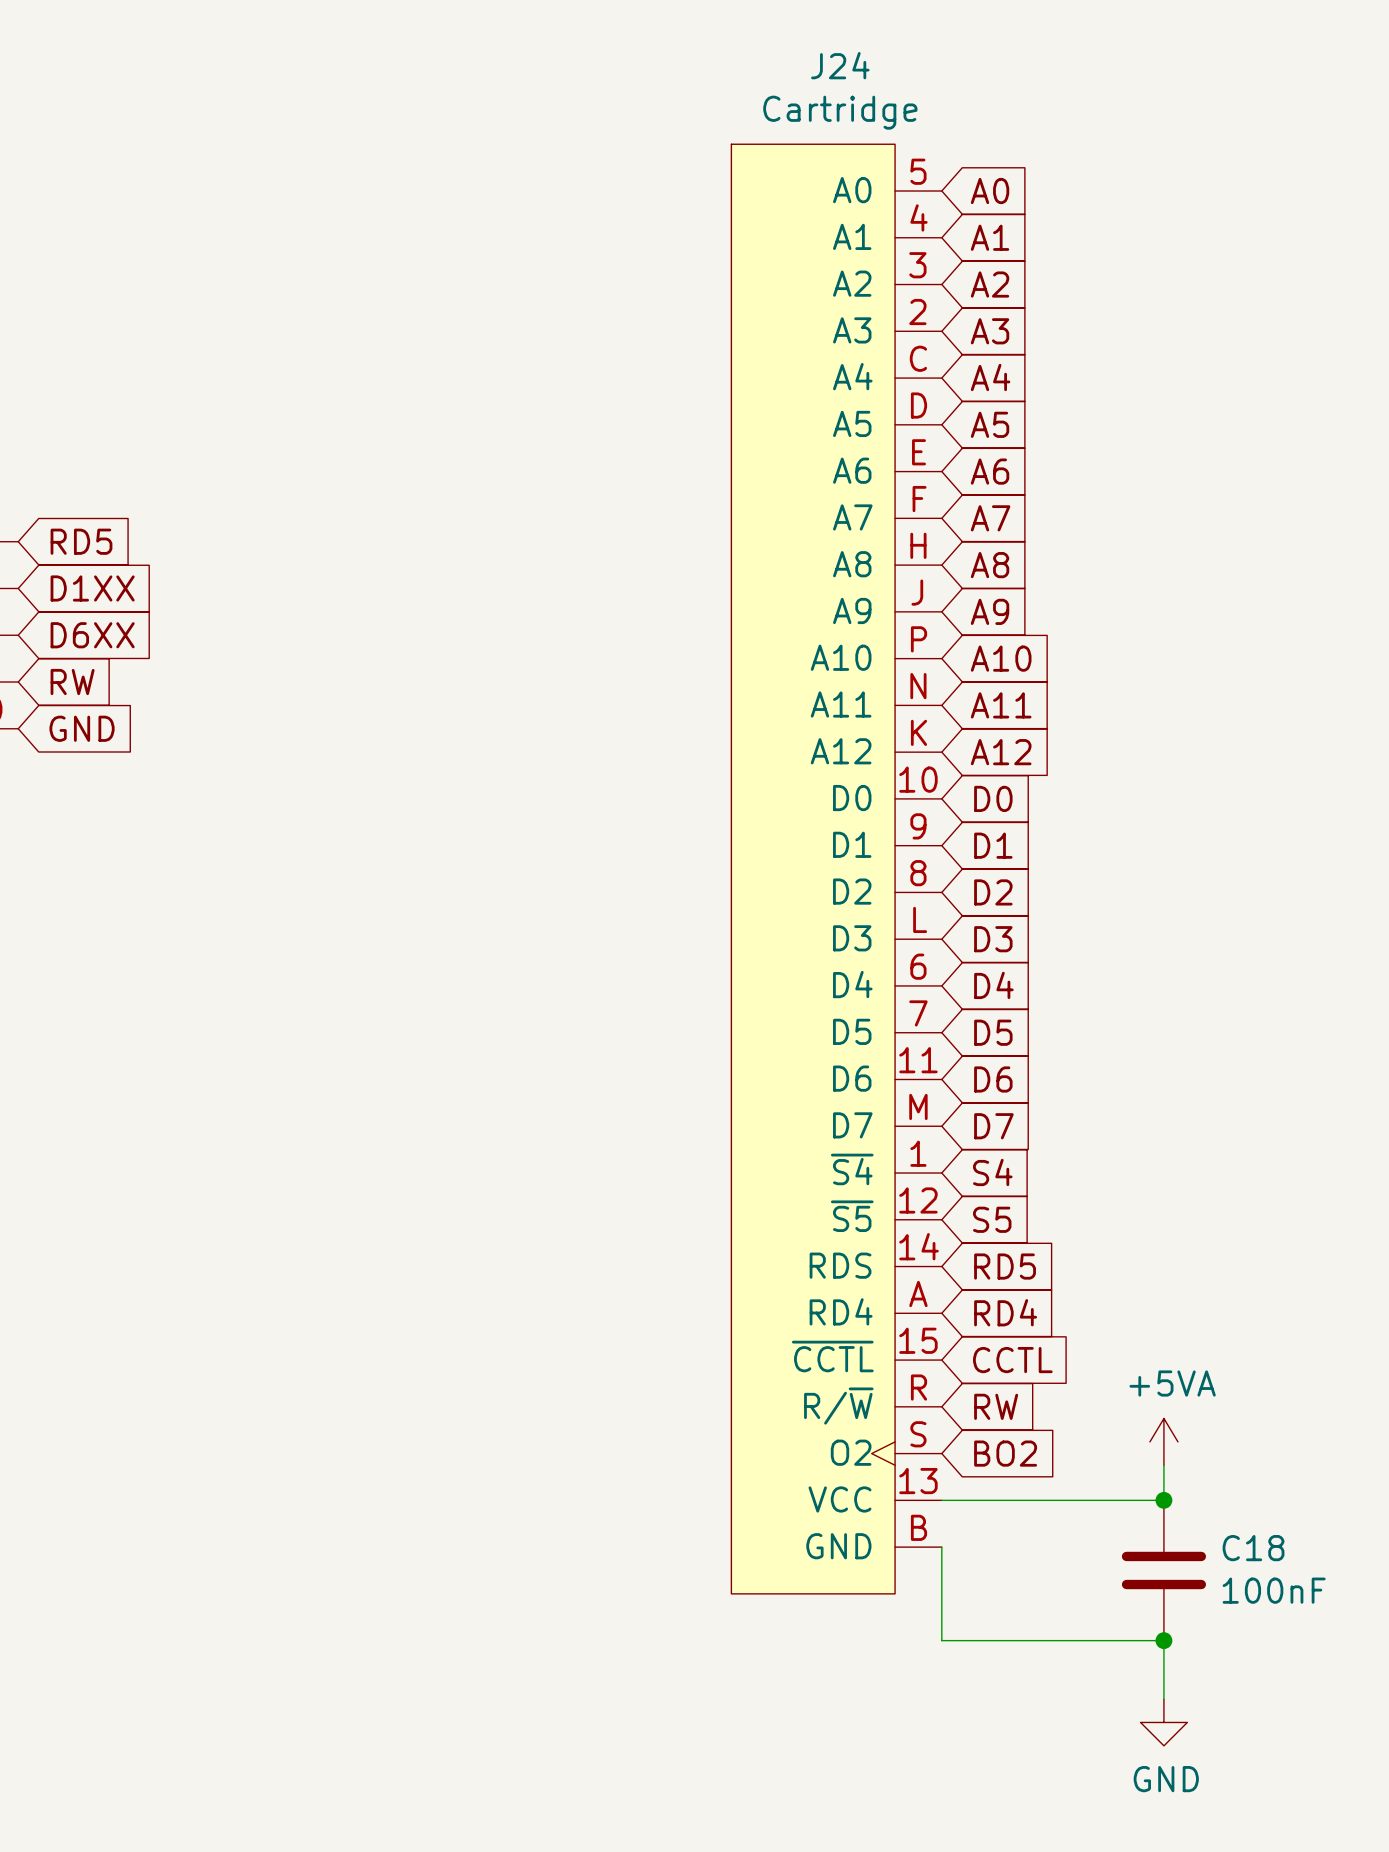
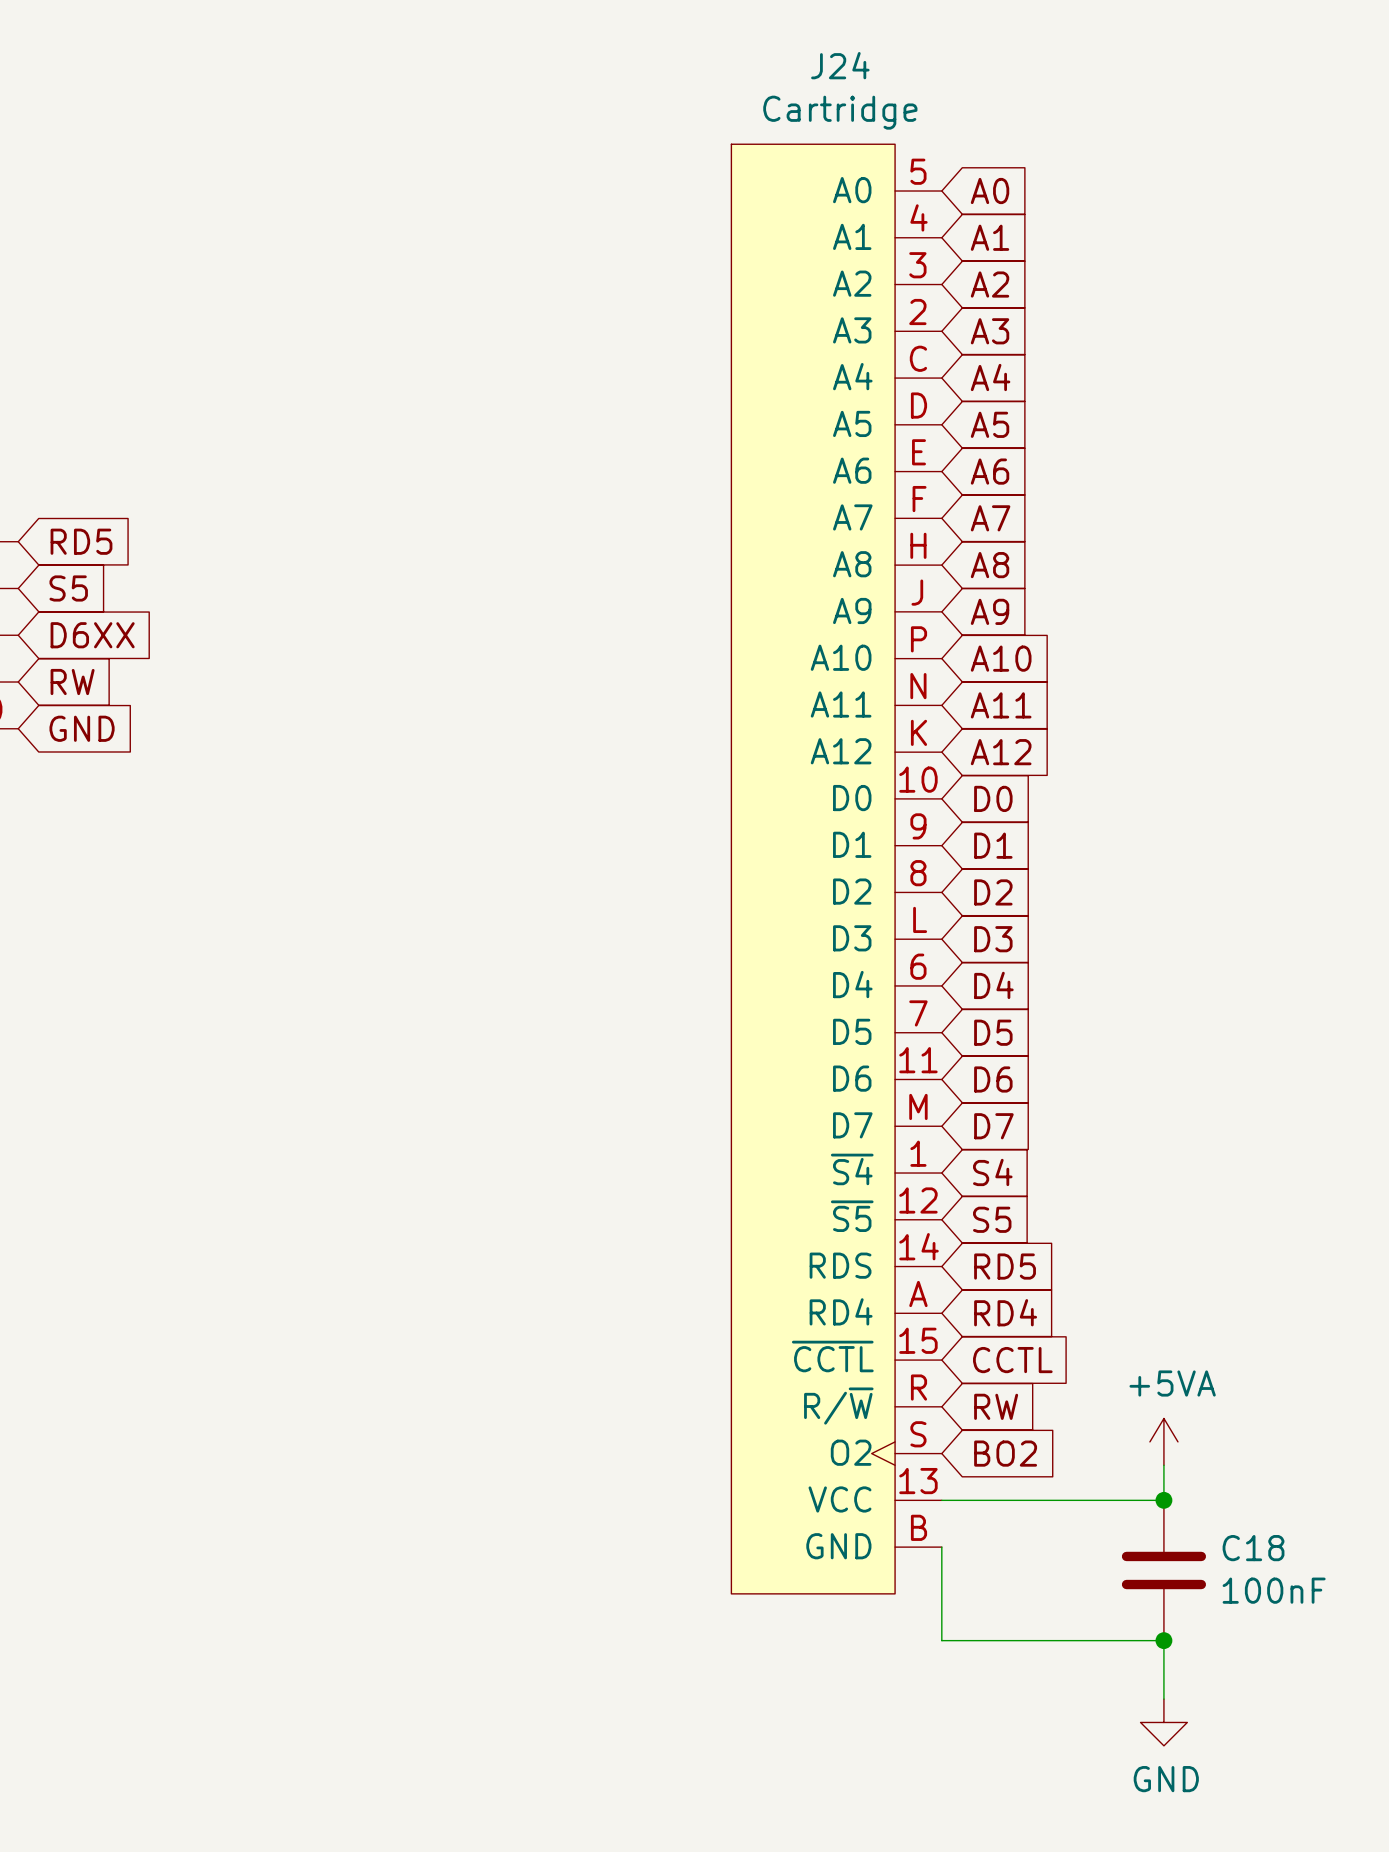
global label: D1XX (92, 588) -> S5 (68, 588)

